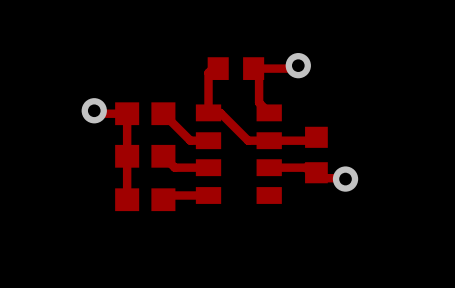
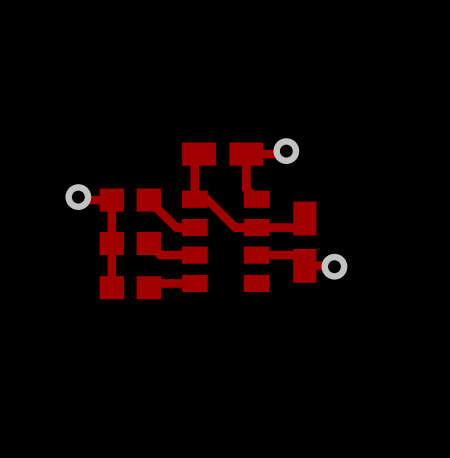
part footprint: [207, 57, 265, 80] -> [182, 142, 264, 166]
part footprint: [305, 126, 328, 184] -> [293, 201, 317, 283]

